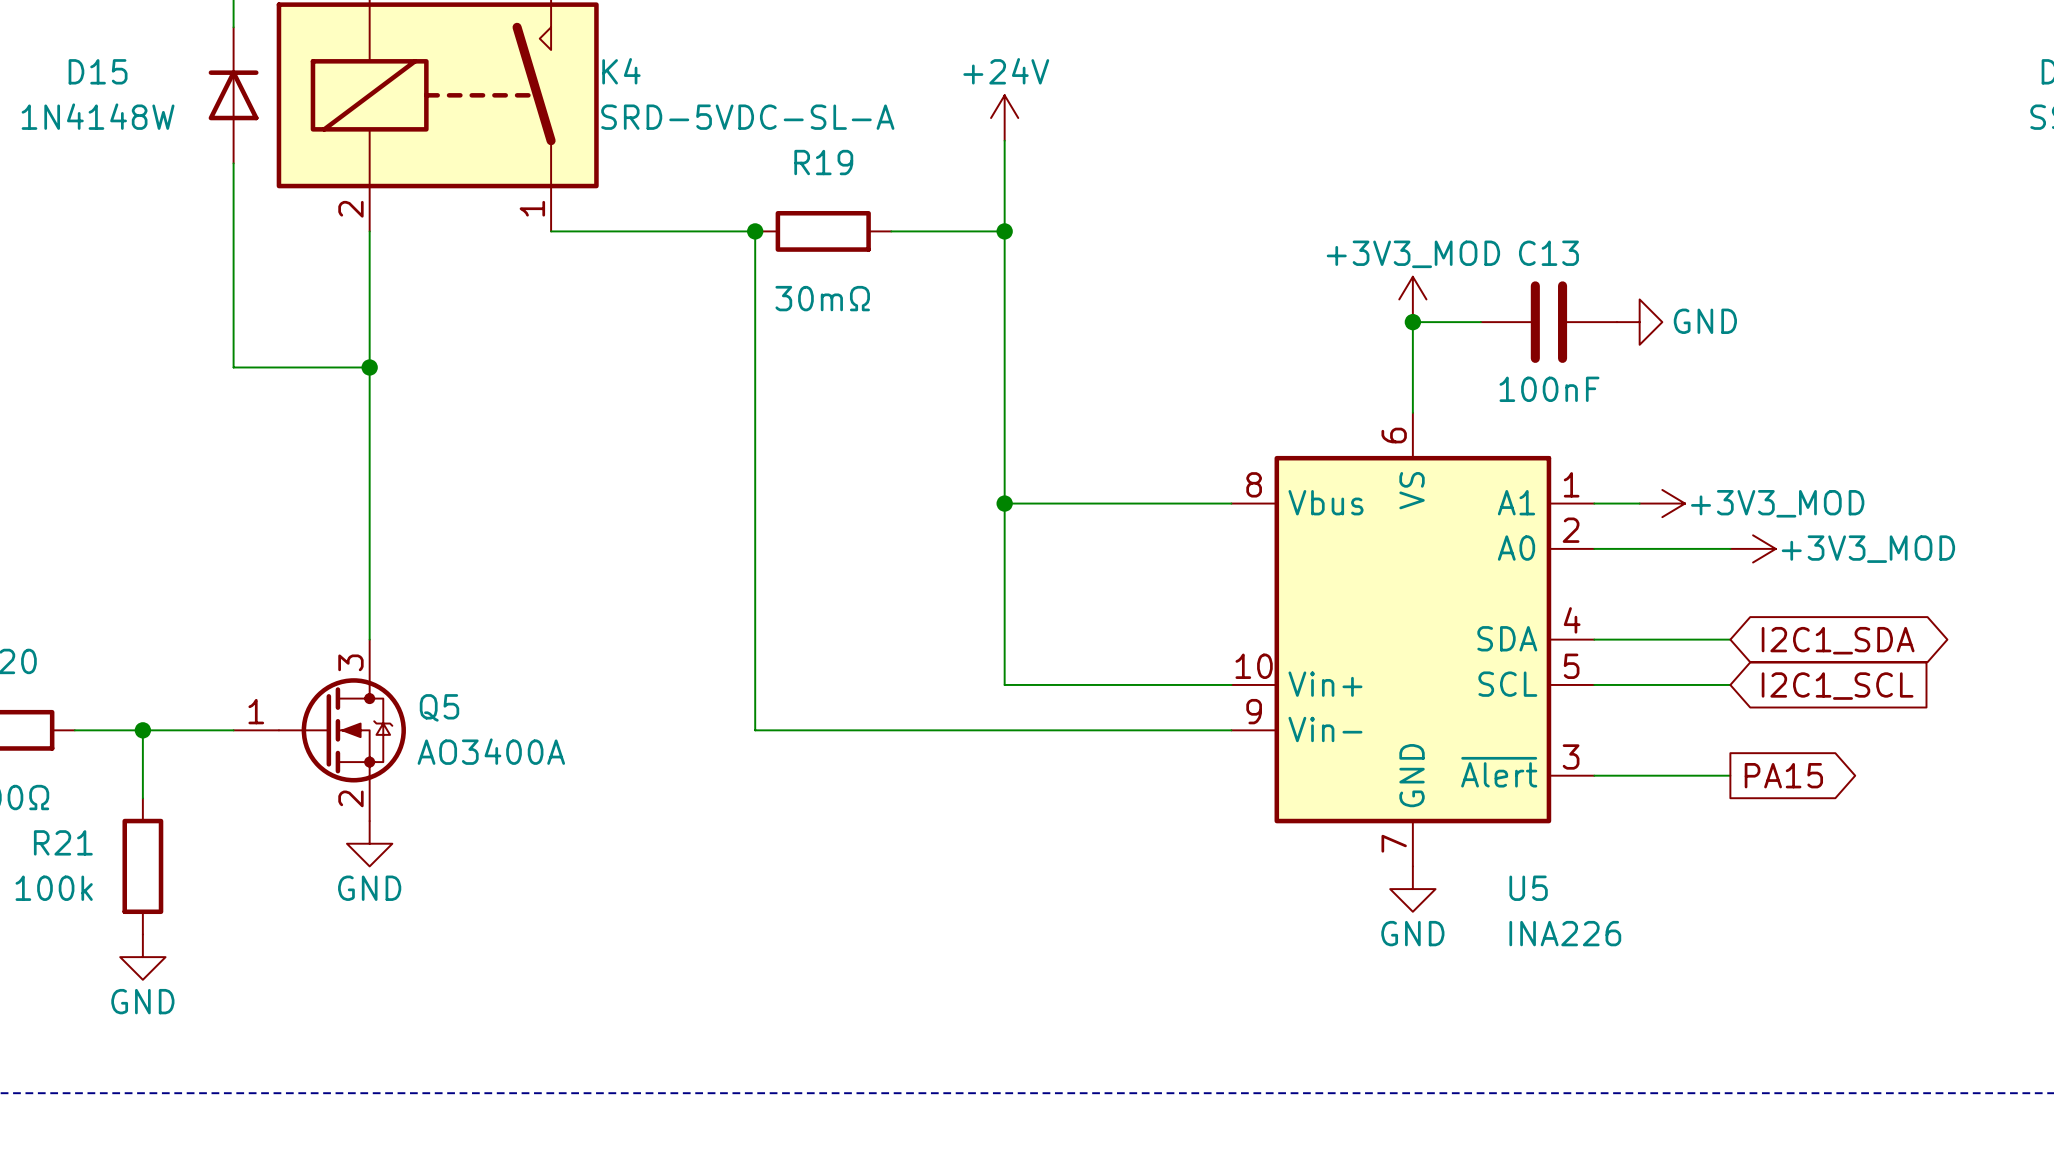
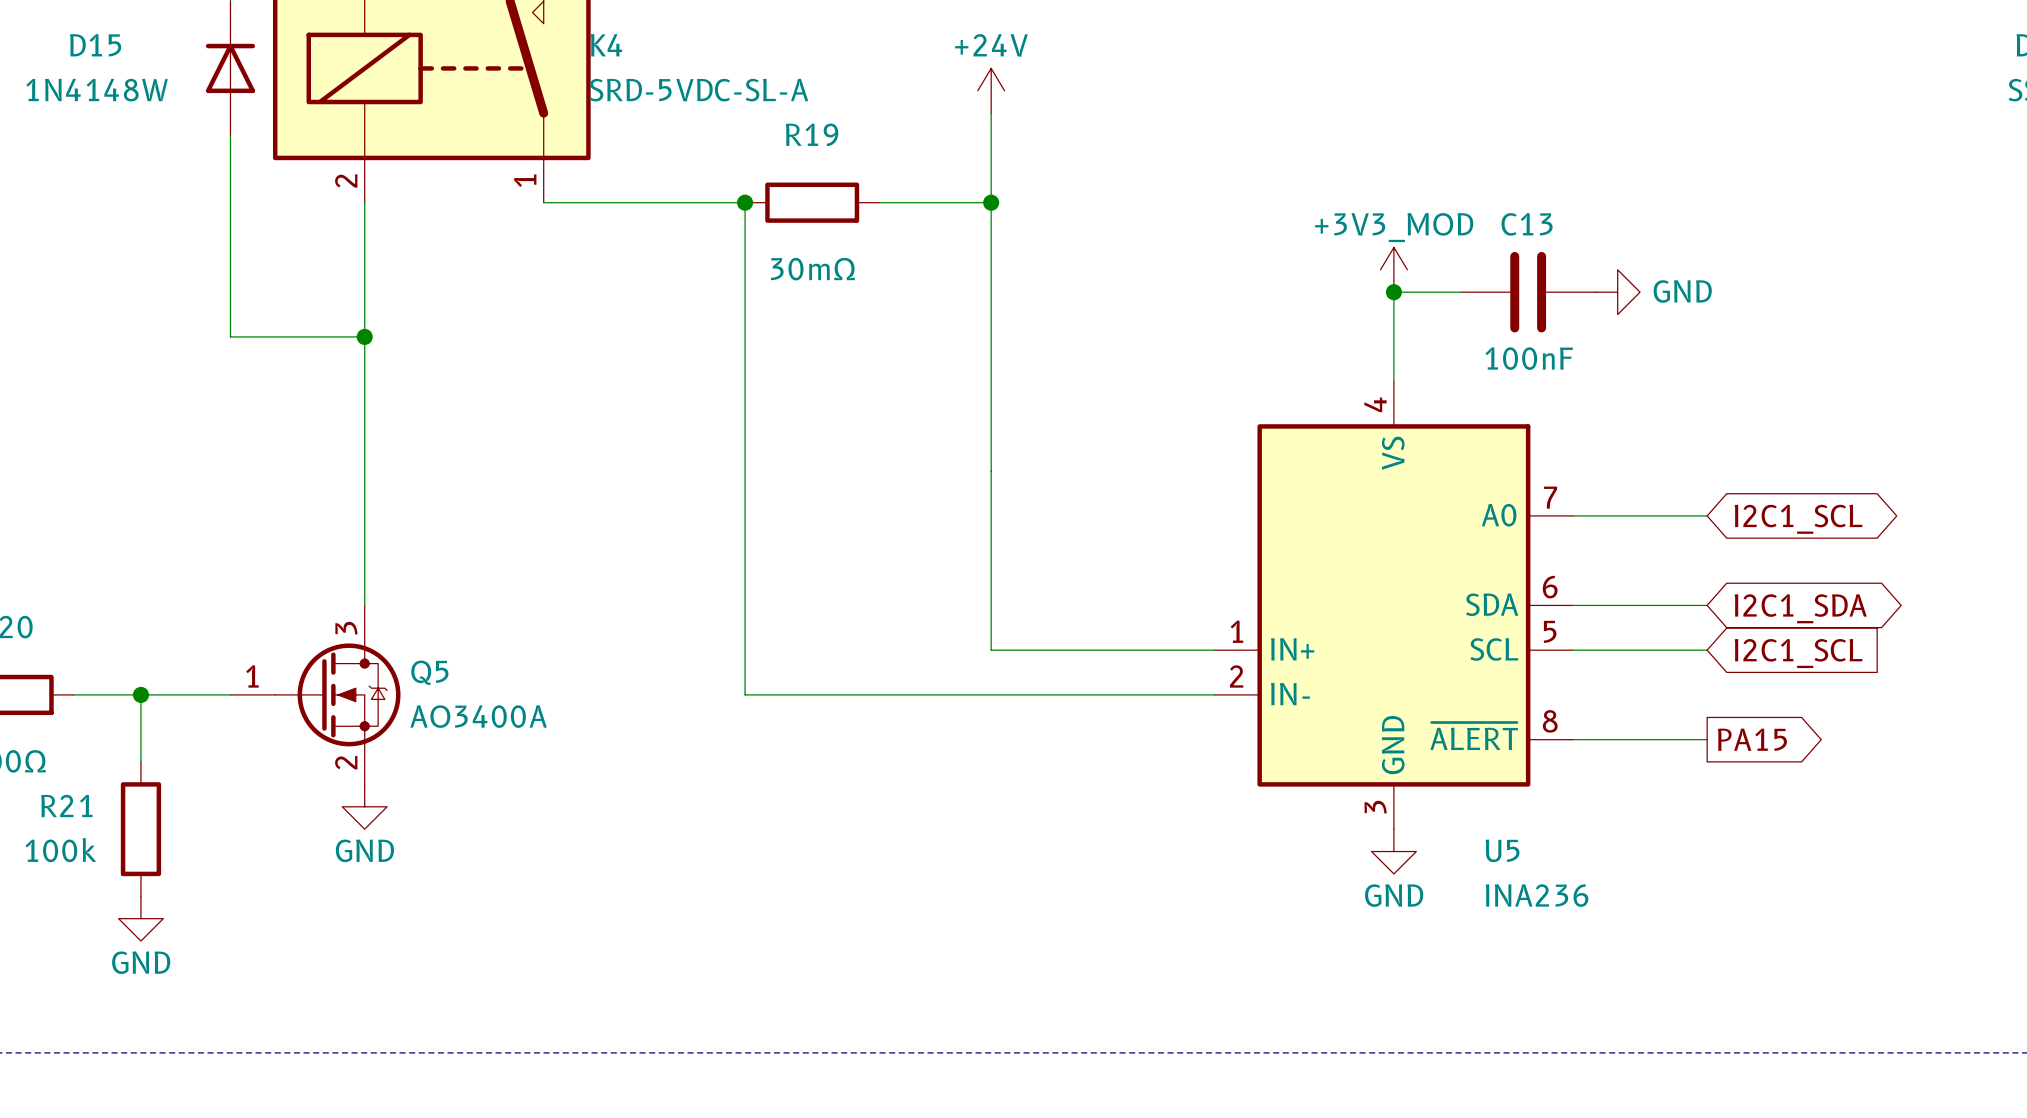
U5 symbol: [1231, 412, 1595, 867] -> [1214, 381, 1573, 830]
wire: (1004, 503) (1231, 503) -> none
junction: (1004, 503) -> none
wire: (1594, 503) (1639, 503) -> none
power symbol: +3V3_MOD (1662, 503) -> none
power symbol: +3V3_MOD (1753, 548) -> none
global label: none -> I2C1_SCL (1798, 519)
U5 value: INA226 (1565, 933) -> INA236 (1537, 895)

